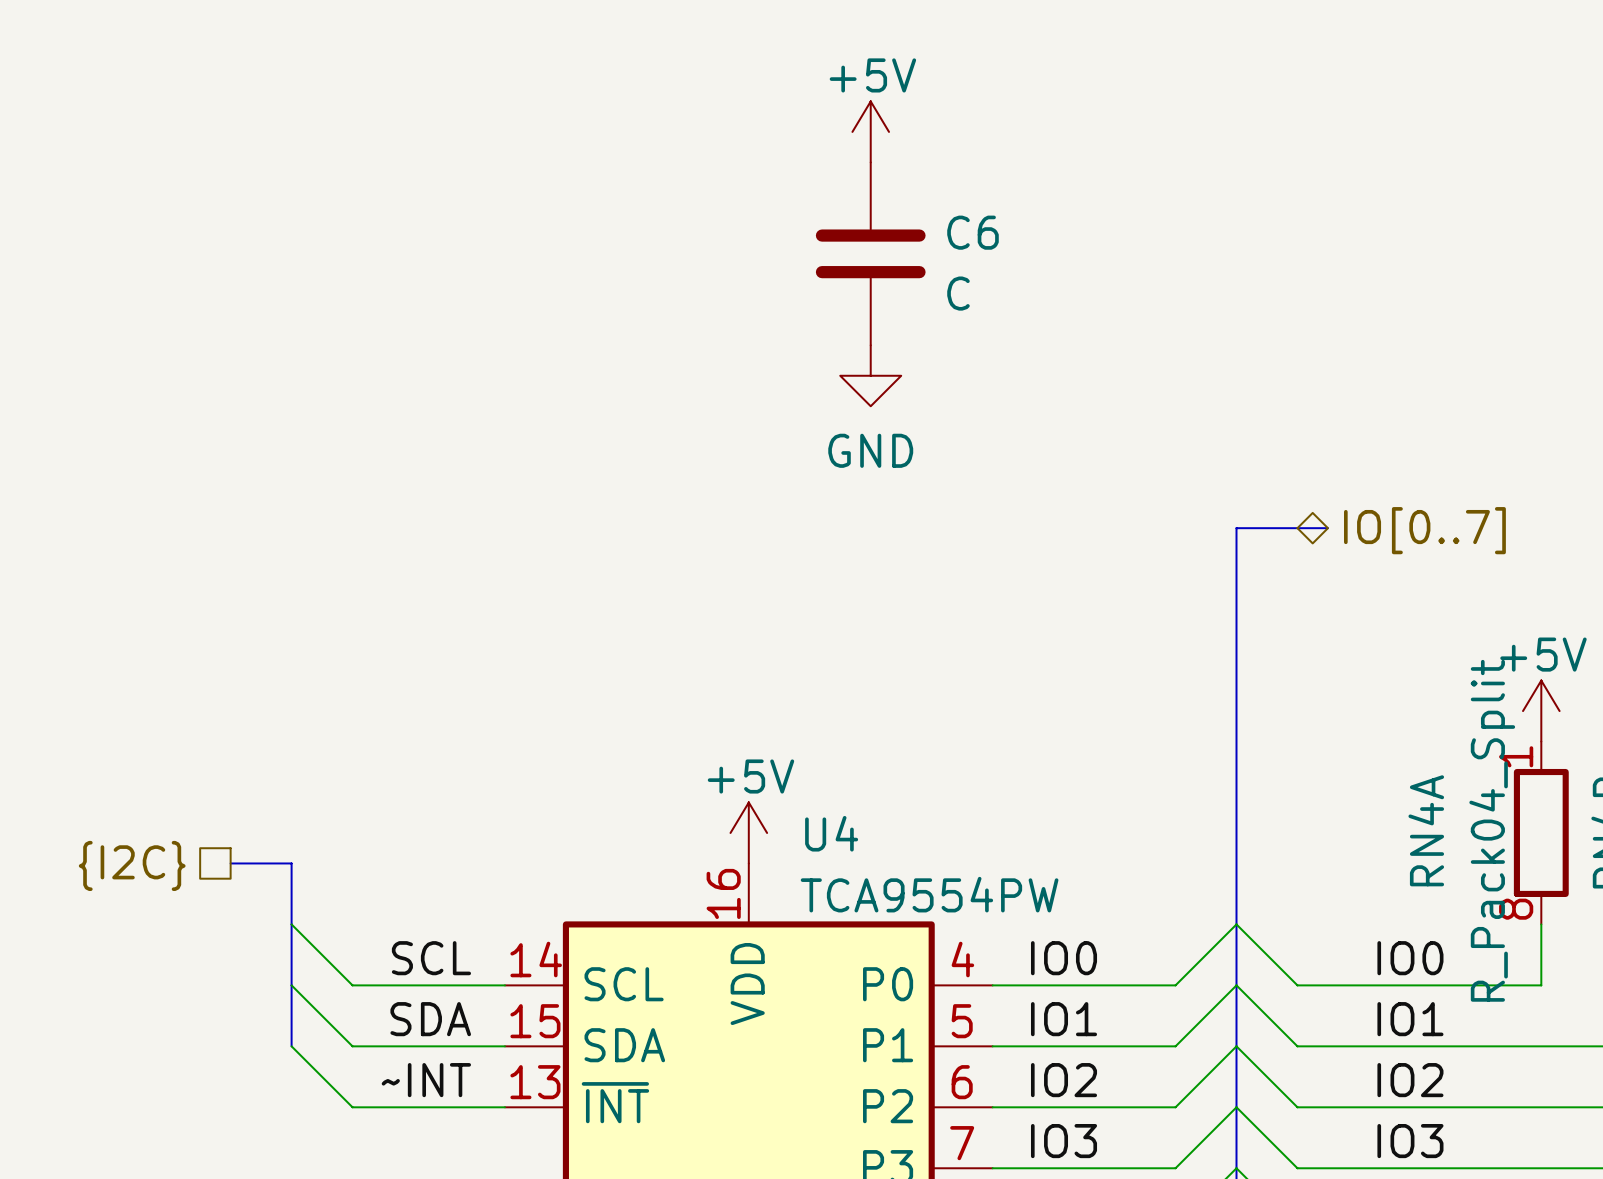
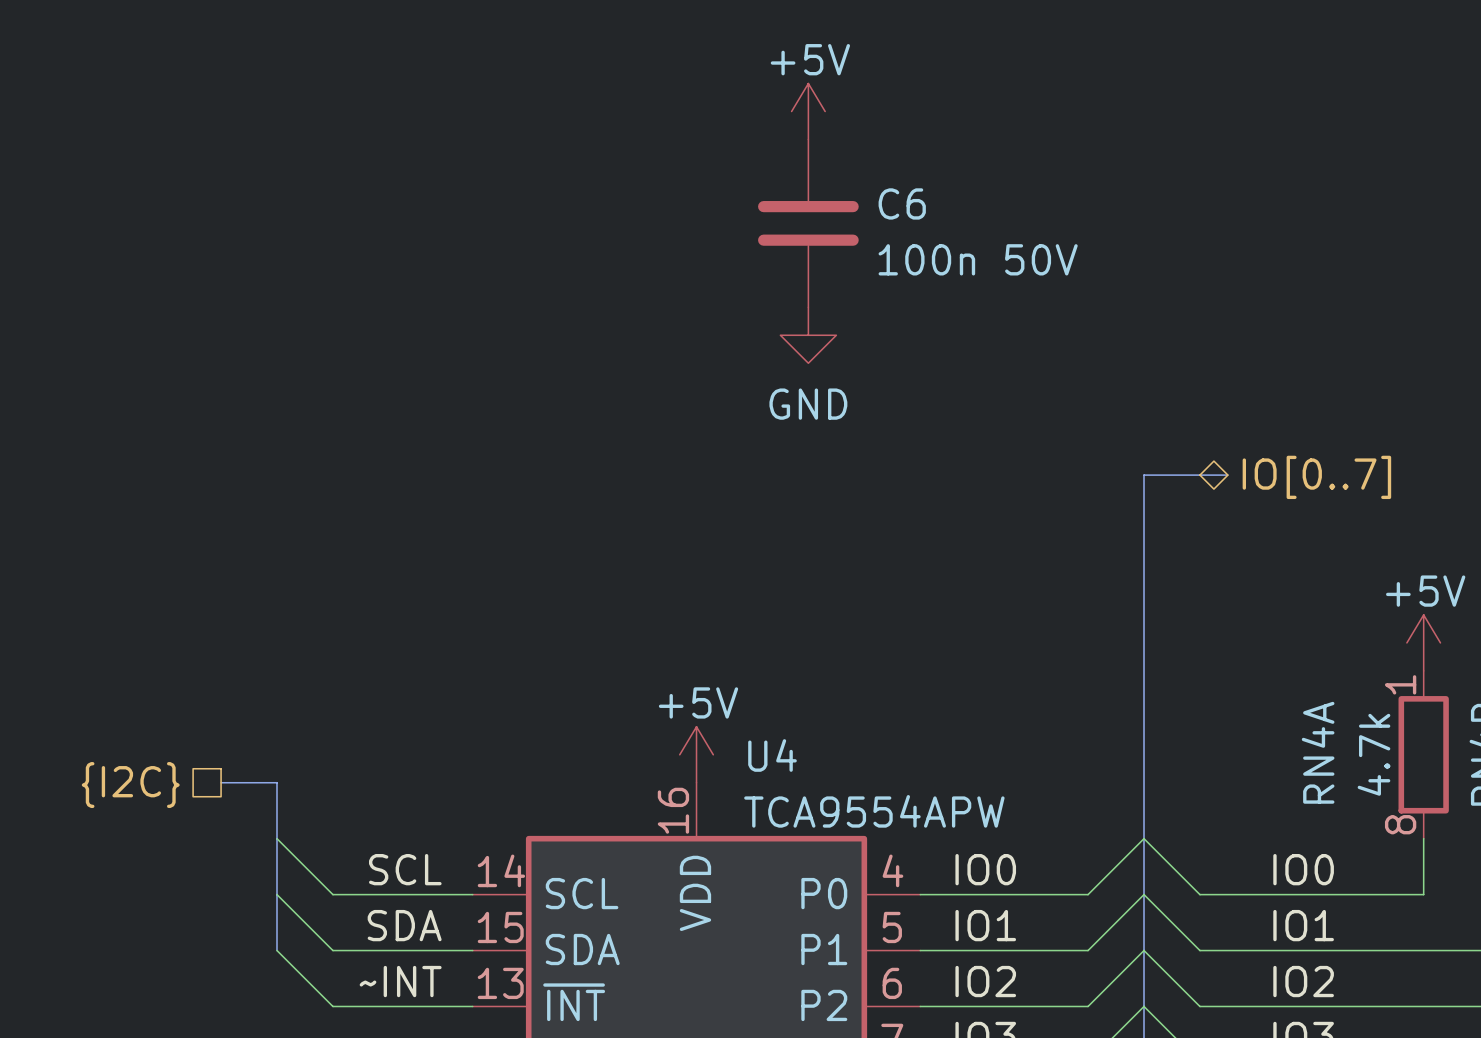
C6 value: C (958, 293) -> 100n 50V (978, 259)
RN4A value: R_Pack04_Split (1492, 830) -> 4.7k (1373, 754)
U4 value: TCA9554PW (929, 894) -> TCA9554APW (874, 811)

